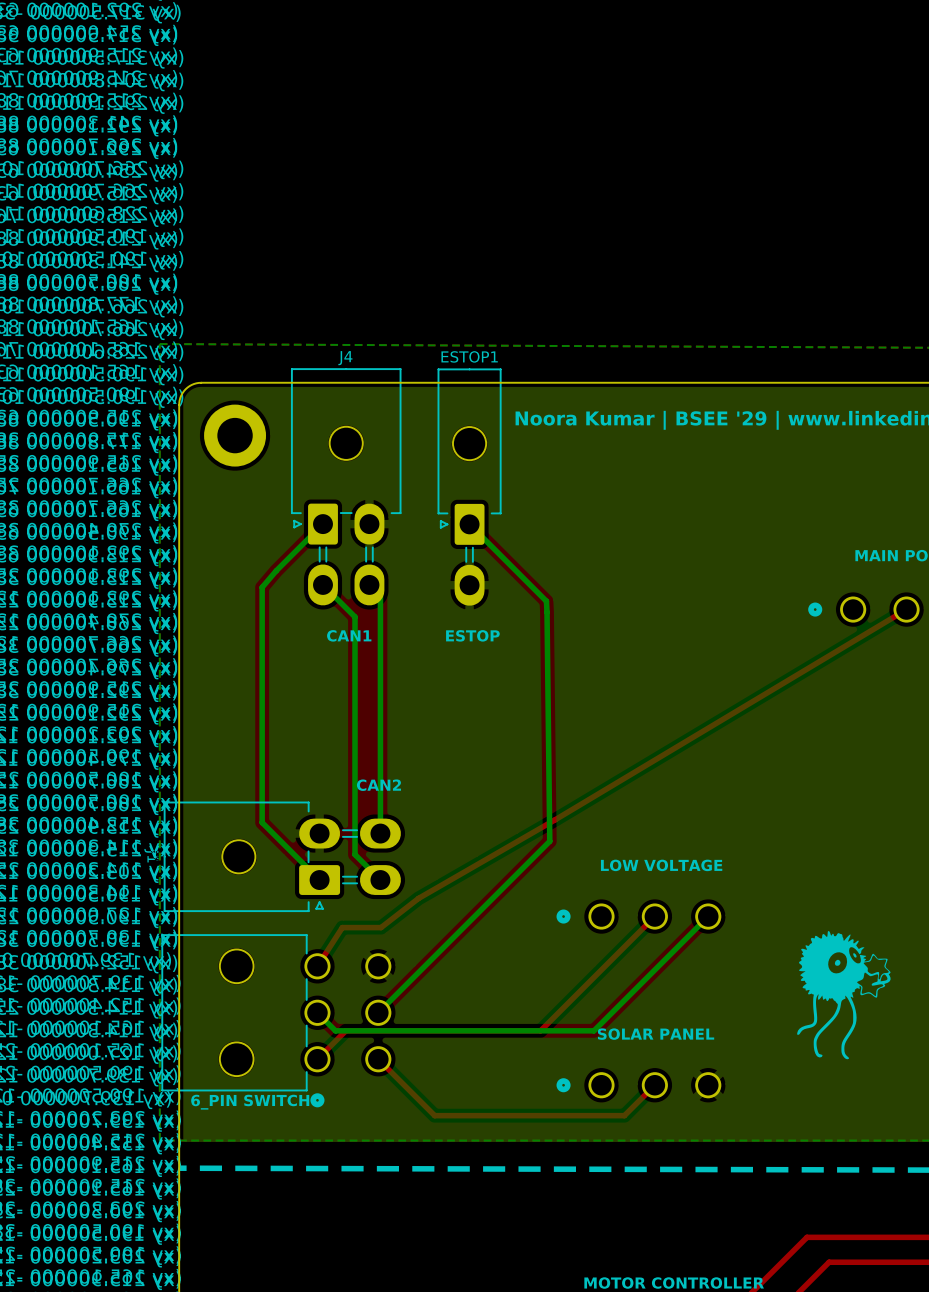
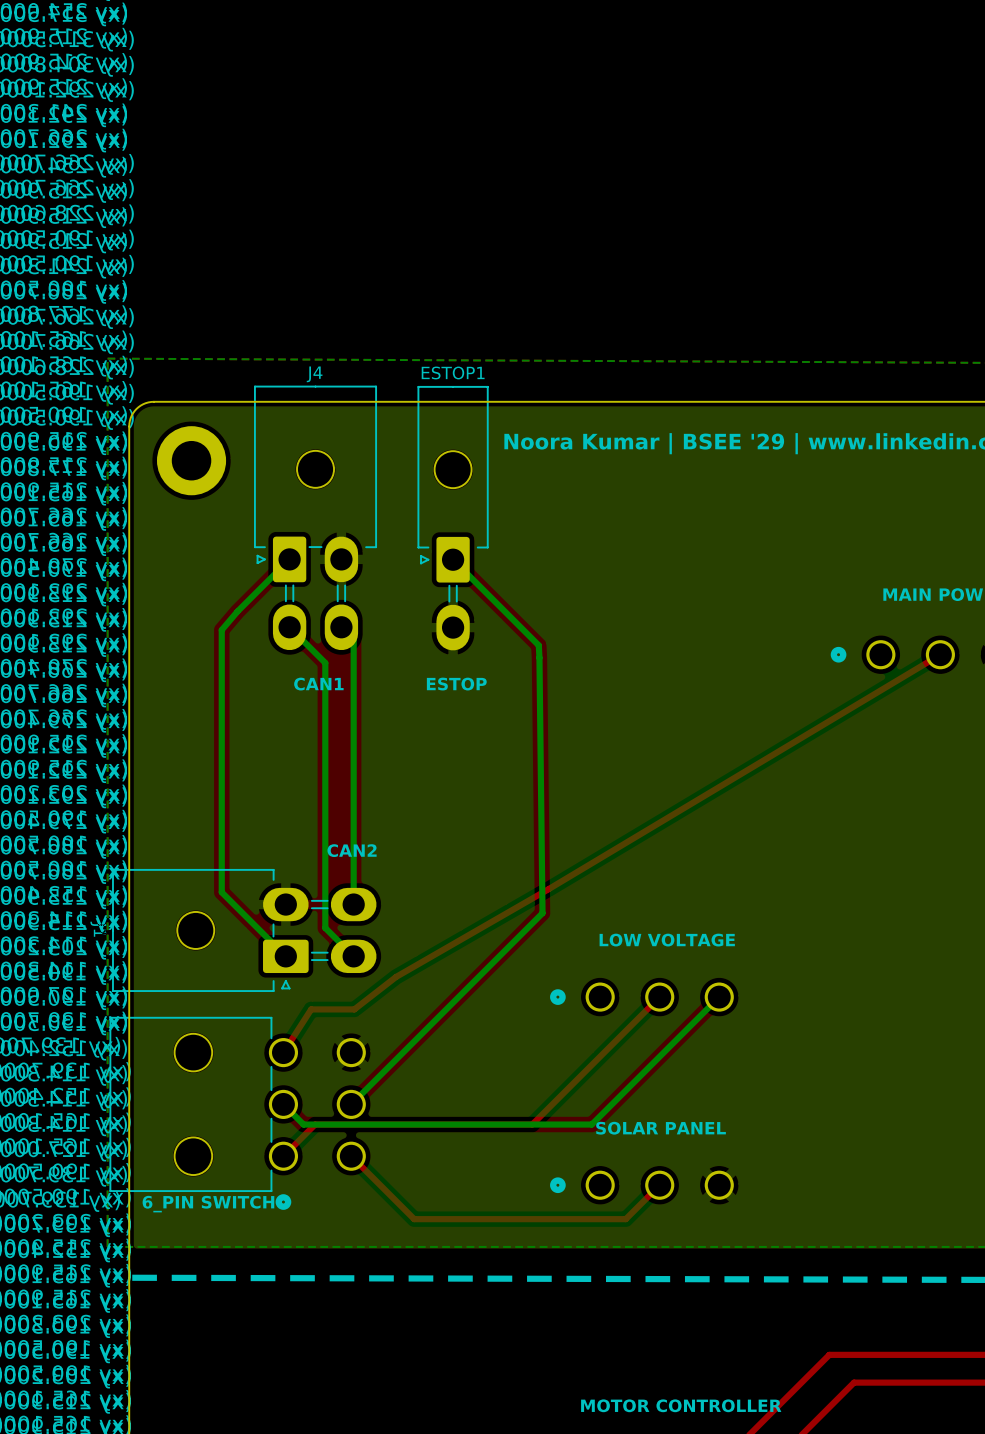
drawing: [797, 931, 891, 1060] -> none

